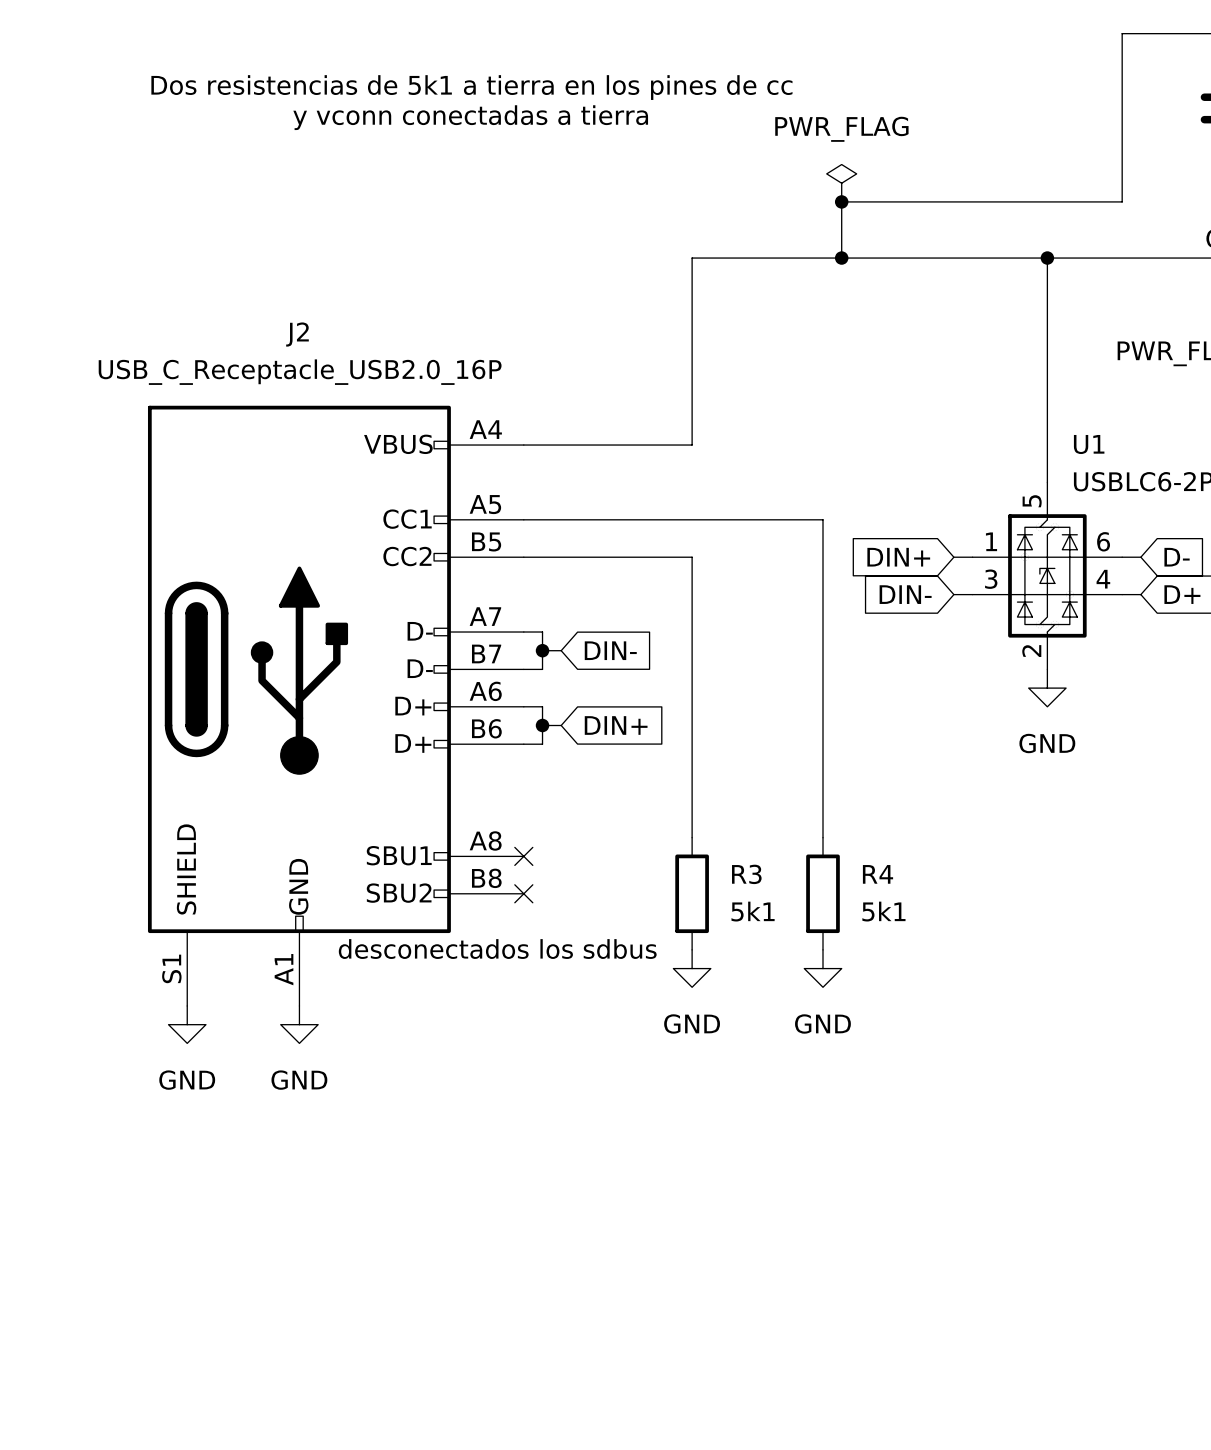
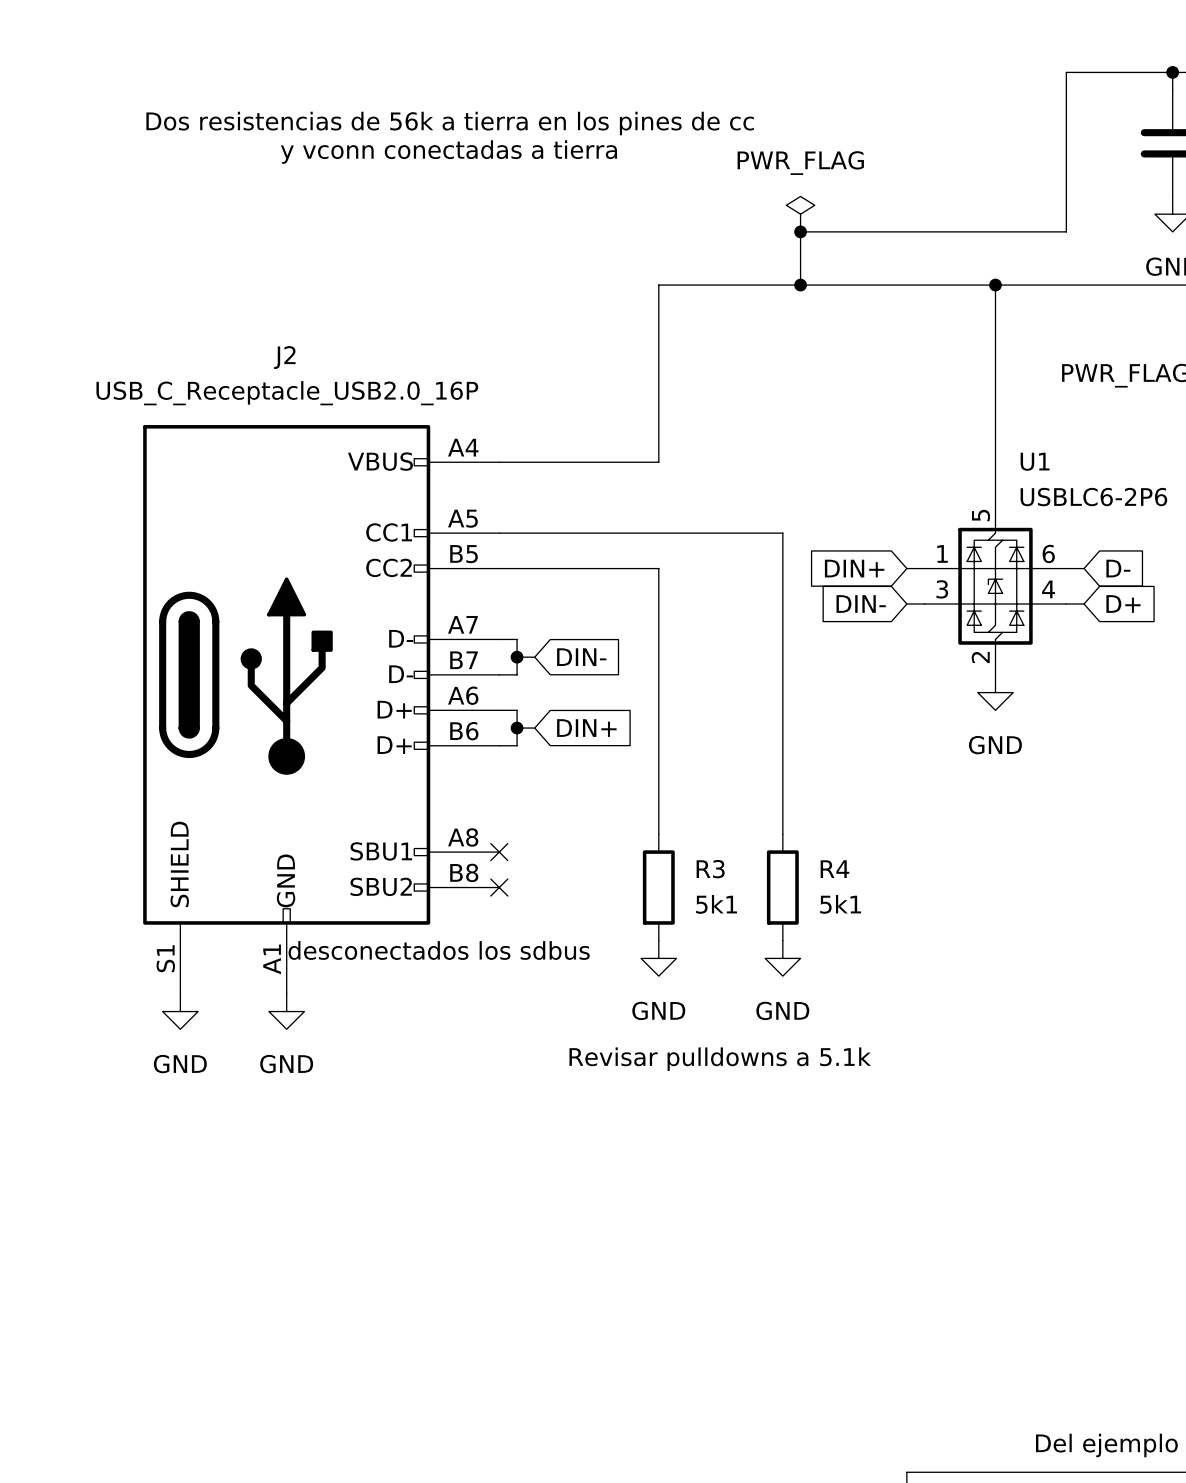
text: Dos resistencias de 5k1 a tierra en los pines de cc (471, 87) -> Dos resistencias de 56k a tierra en los pines de cc (450, 123)
text position: desconectados los sdbus (497, 949) -> desconectados los sdbus (439, 950)
text: none -> Revisar pulldowns a 5.1k (720, 1059)

